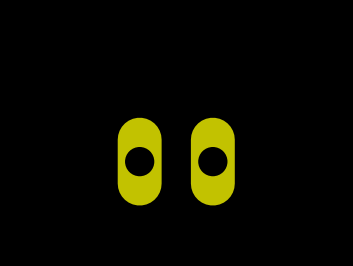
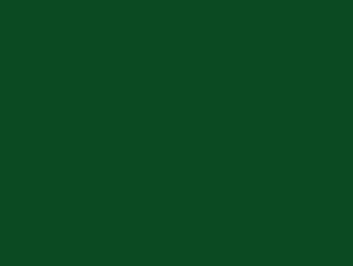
part: (176, 161) -> none

